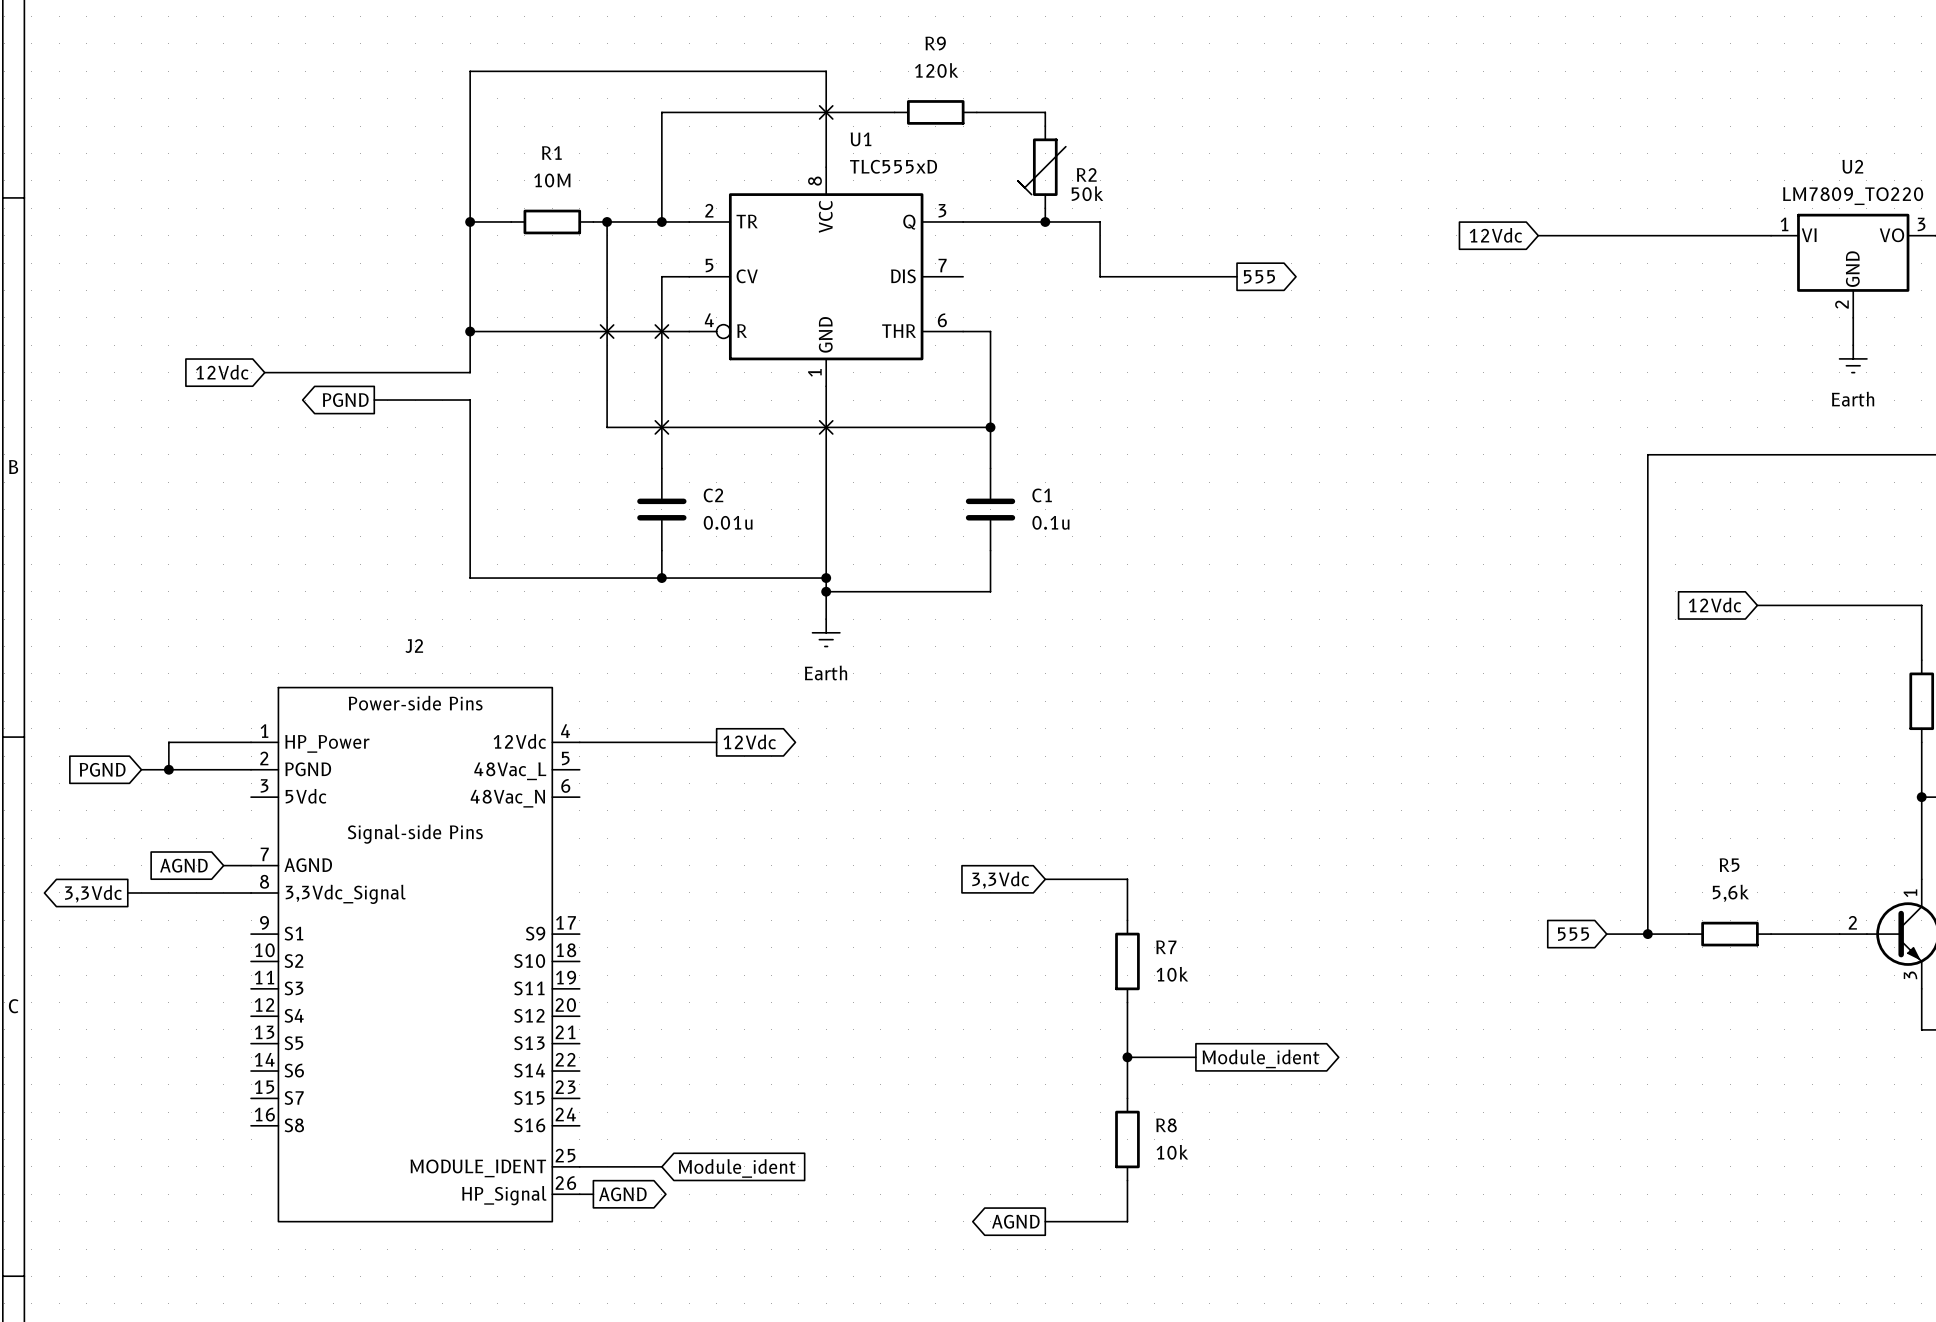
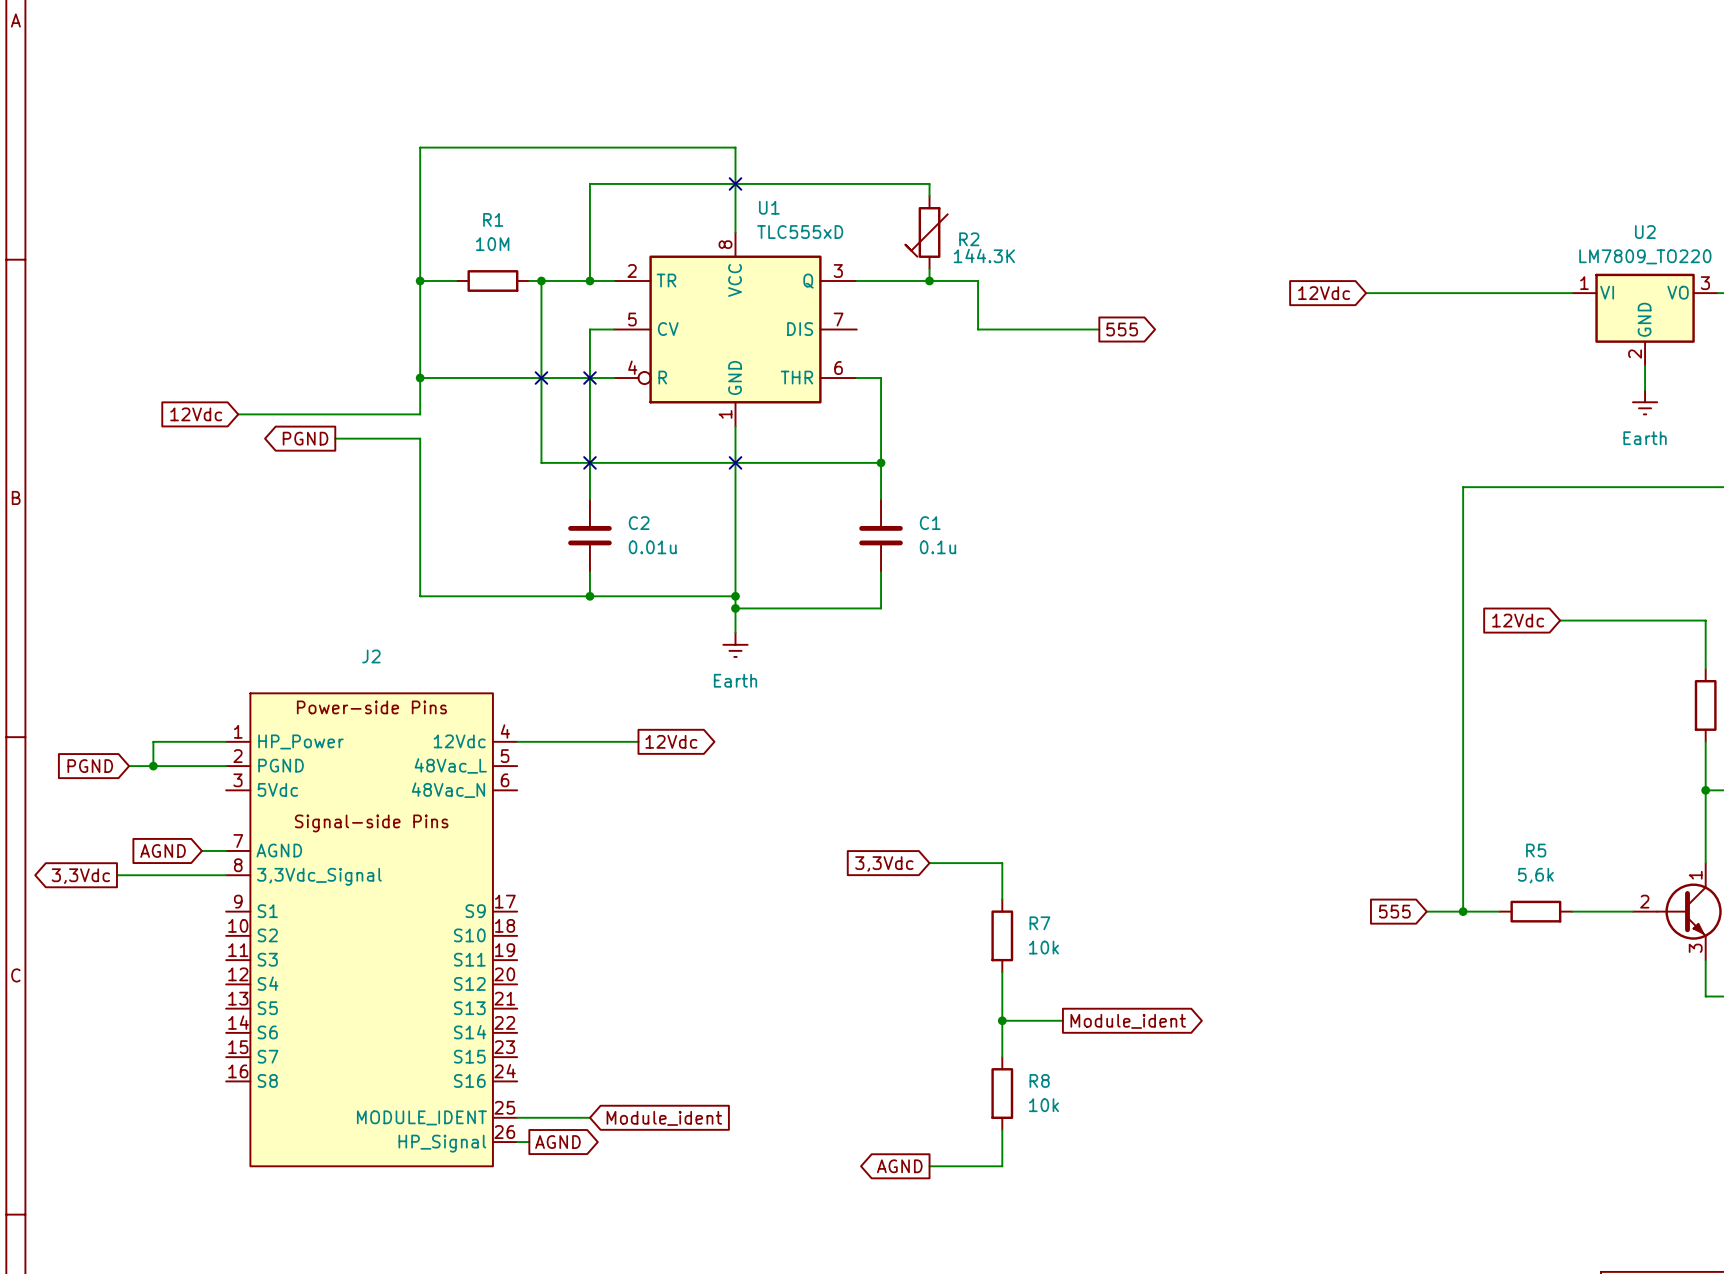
wire: none -> (796, 183) (868, 183)
R9: 120k (935, 112) -> none
R2 value: 50k (1087, 193) -> 144.3K (984, 256)

